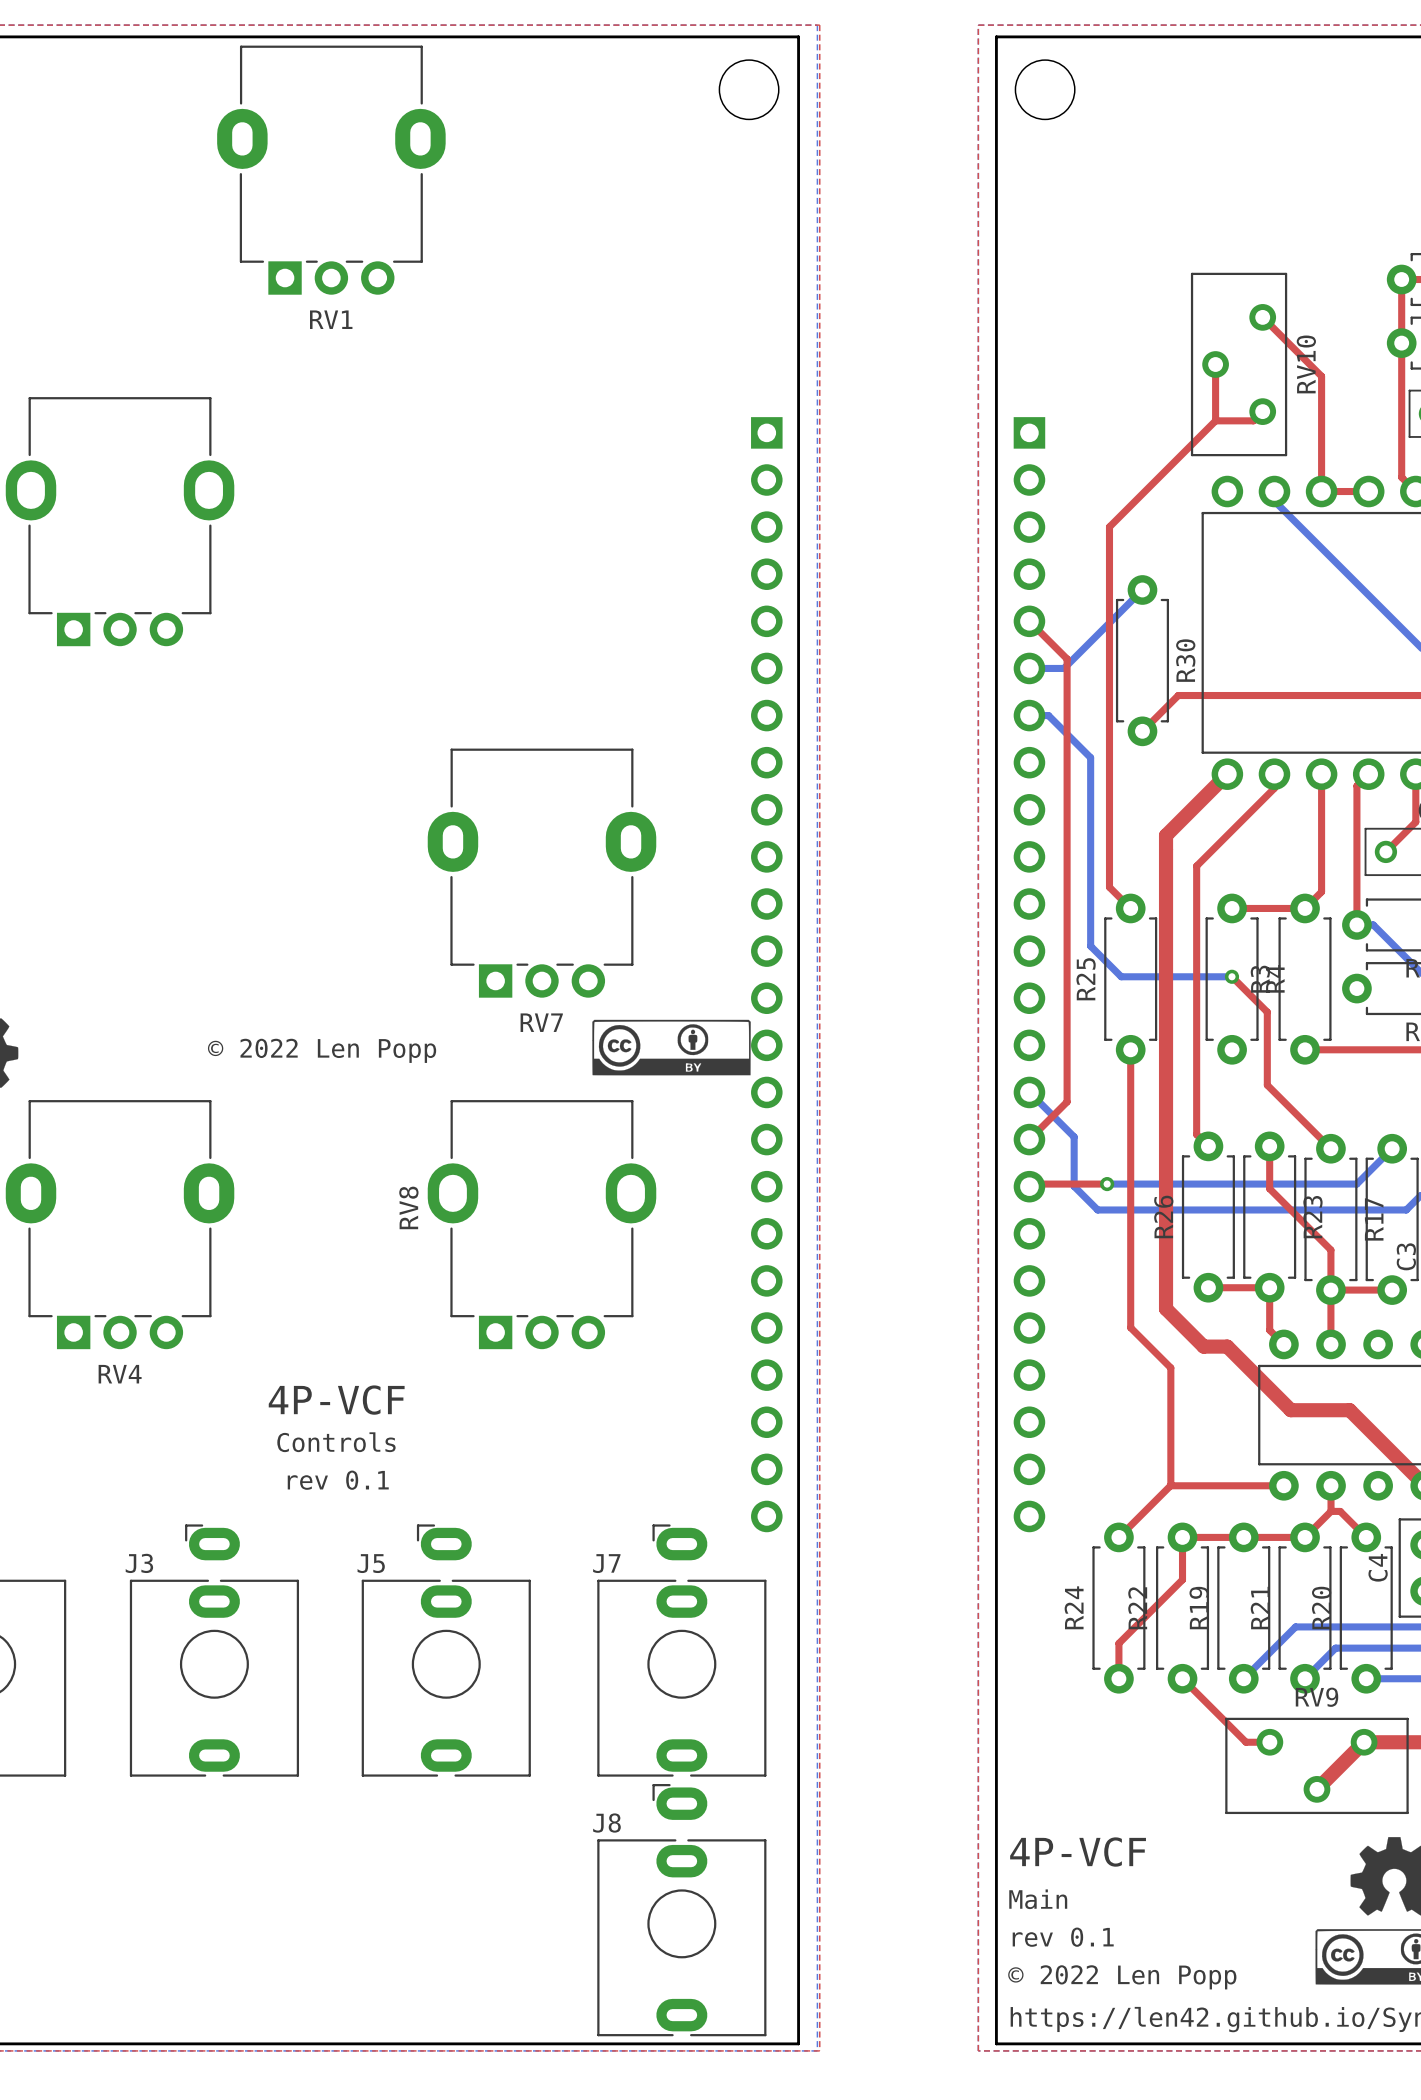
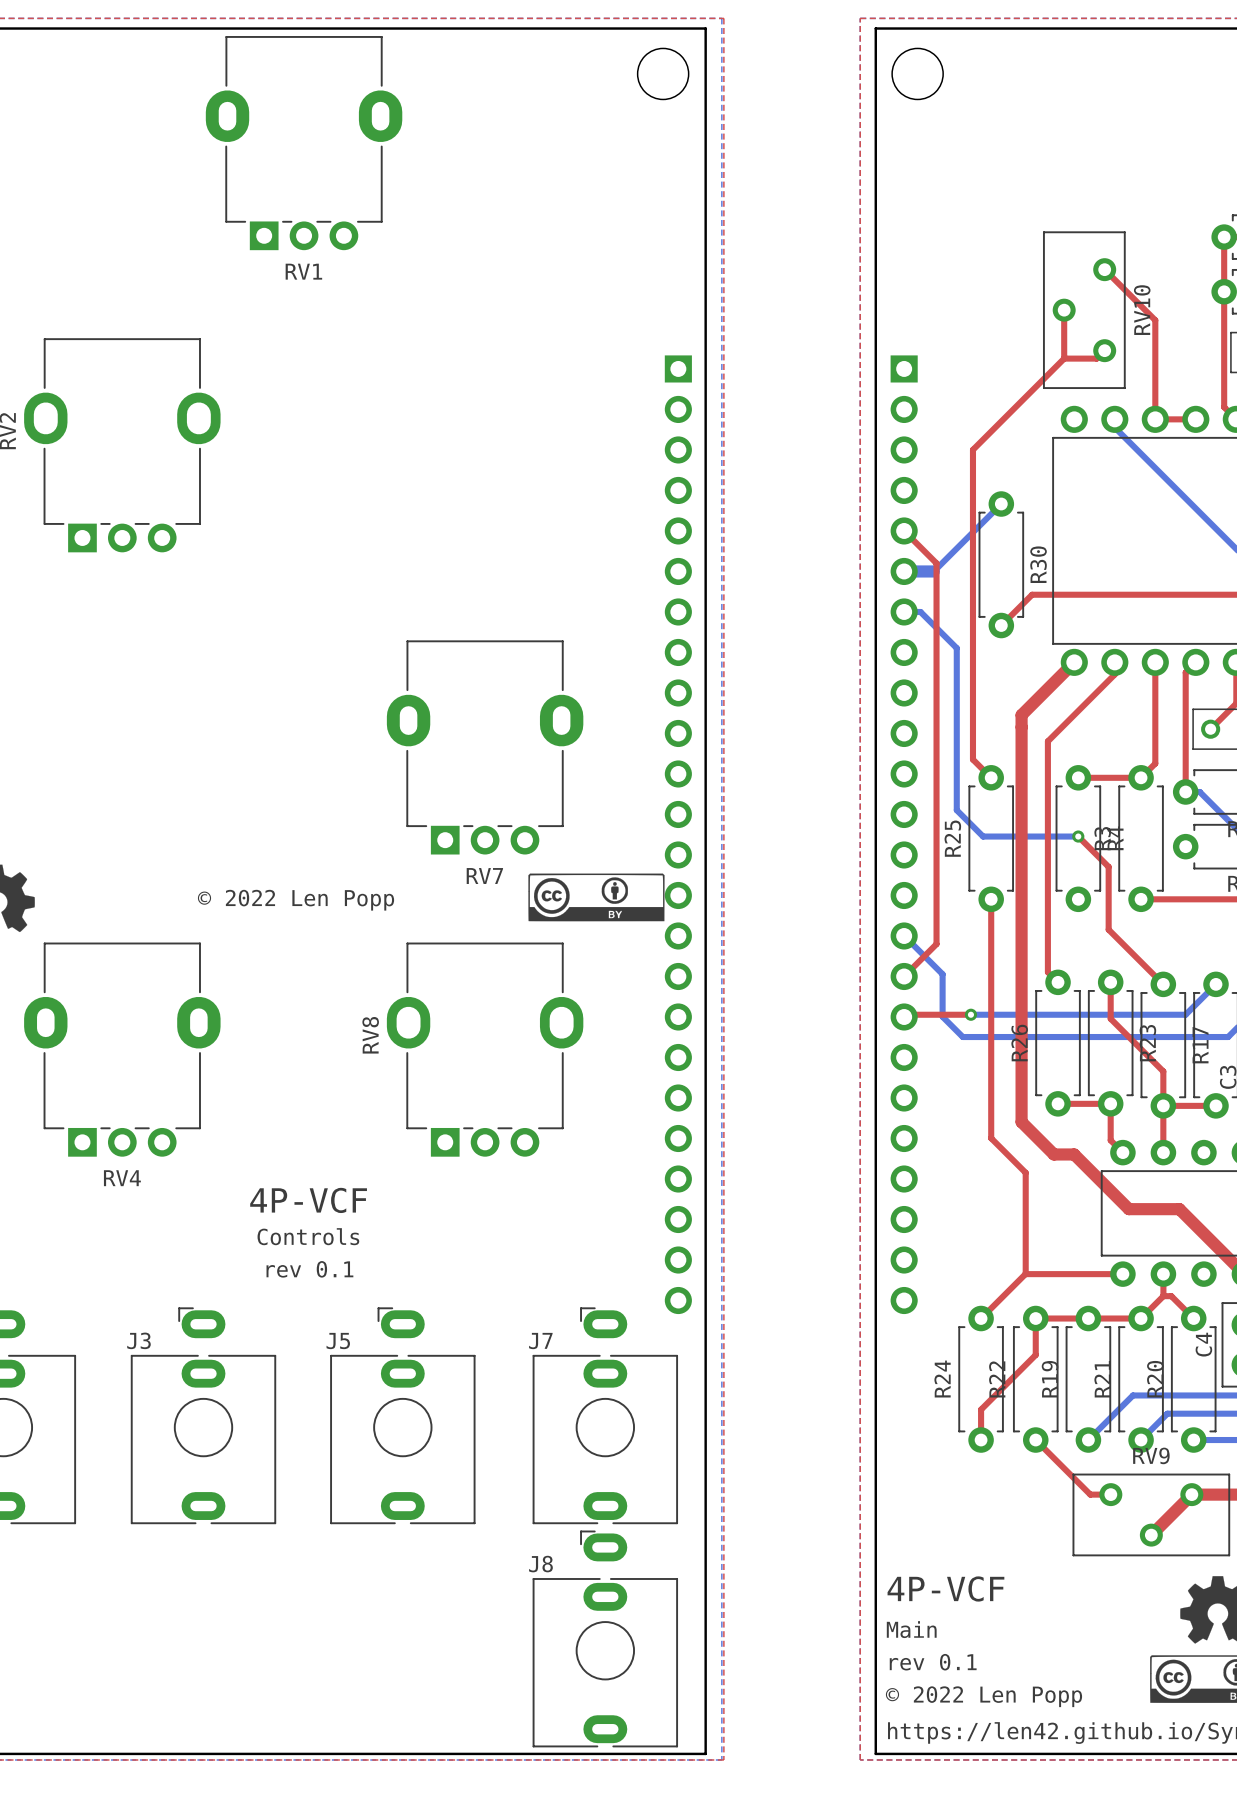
bottom track width: thin (1029, 668) (1064, 668) -> thick (904, 571) (933, 571)

